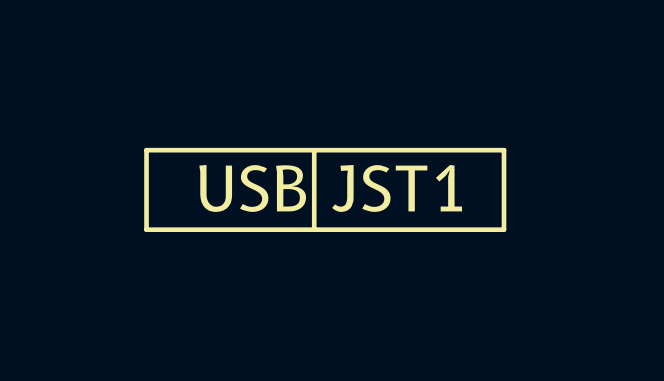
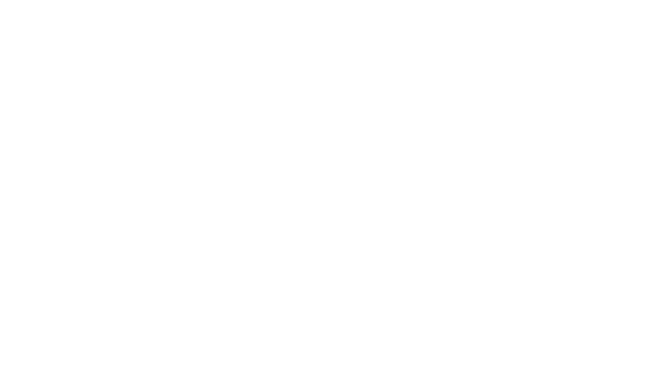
line: (146, 150) (146, 229) (504, 229) (504, 150) (146, 150) -> none
line: (314, 150) (314, 229) -> none
text: USB JST1 (330, 188) -> none

